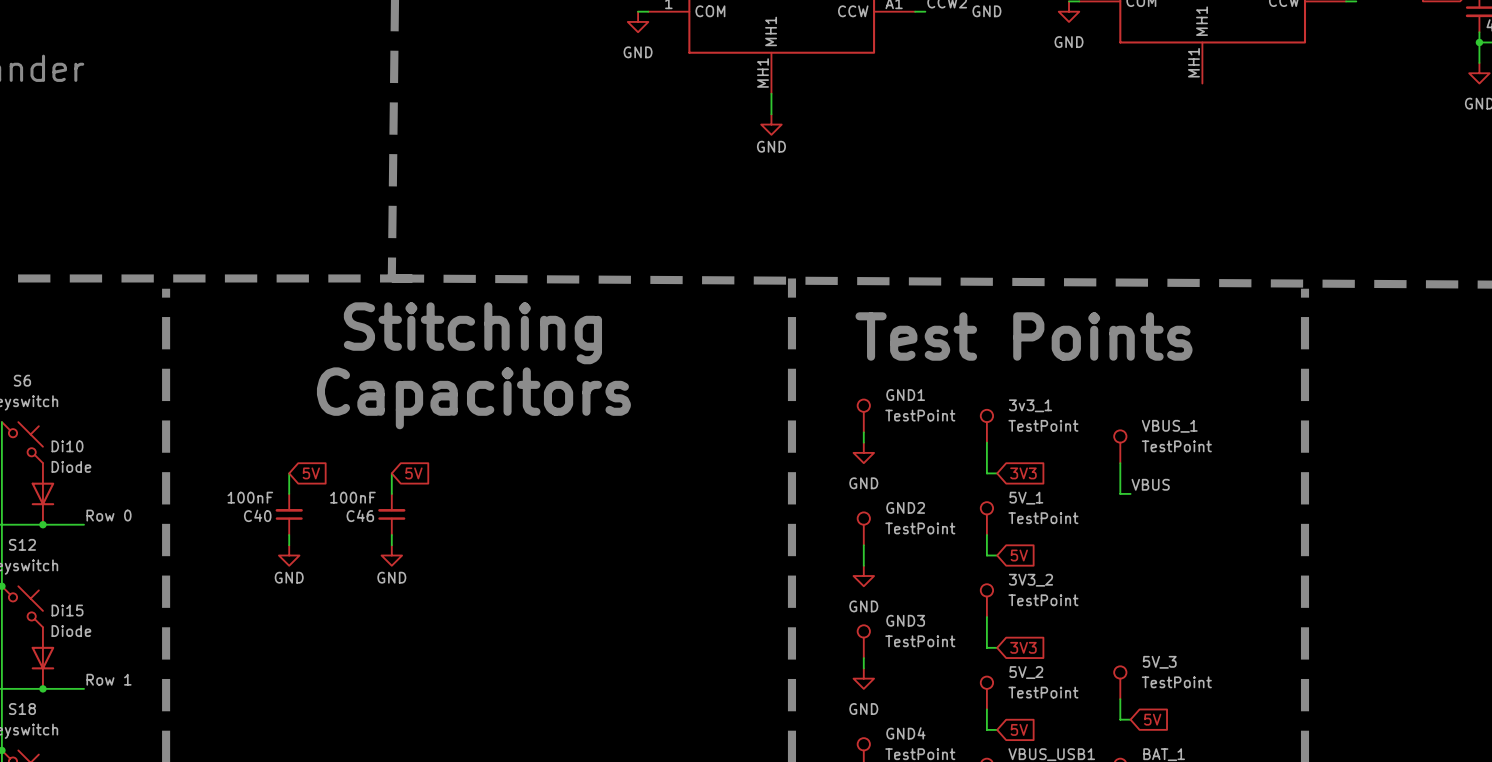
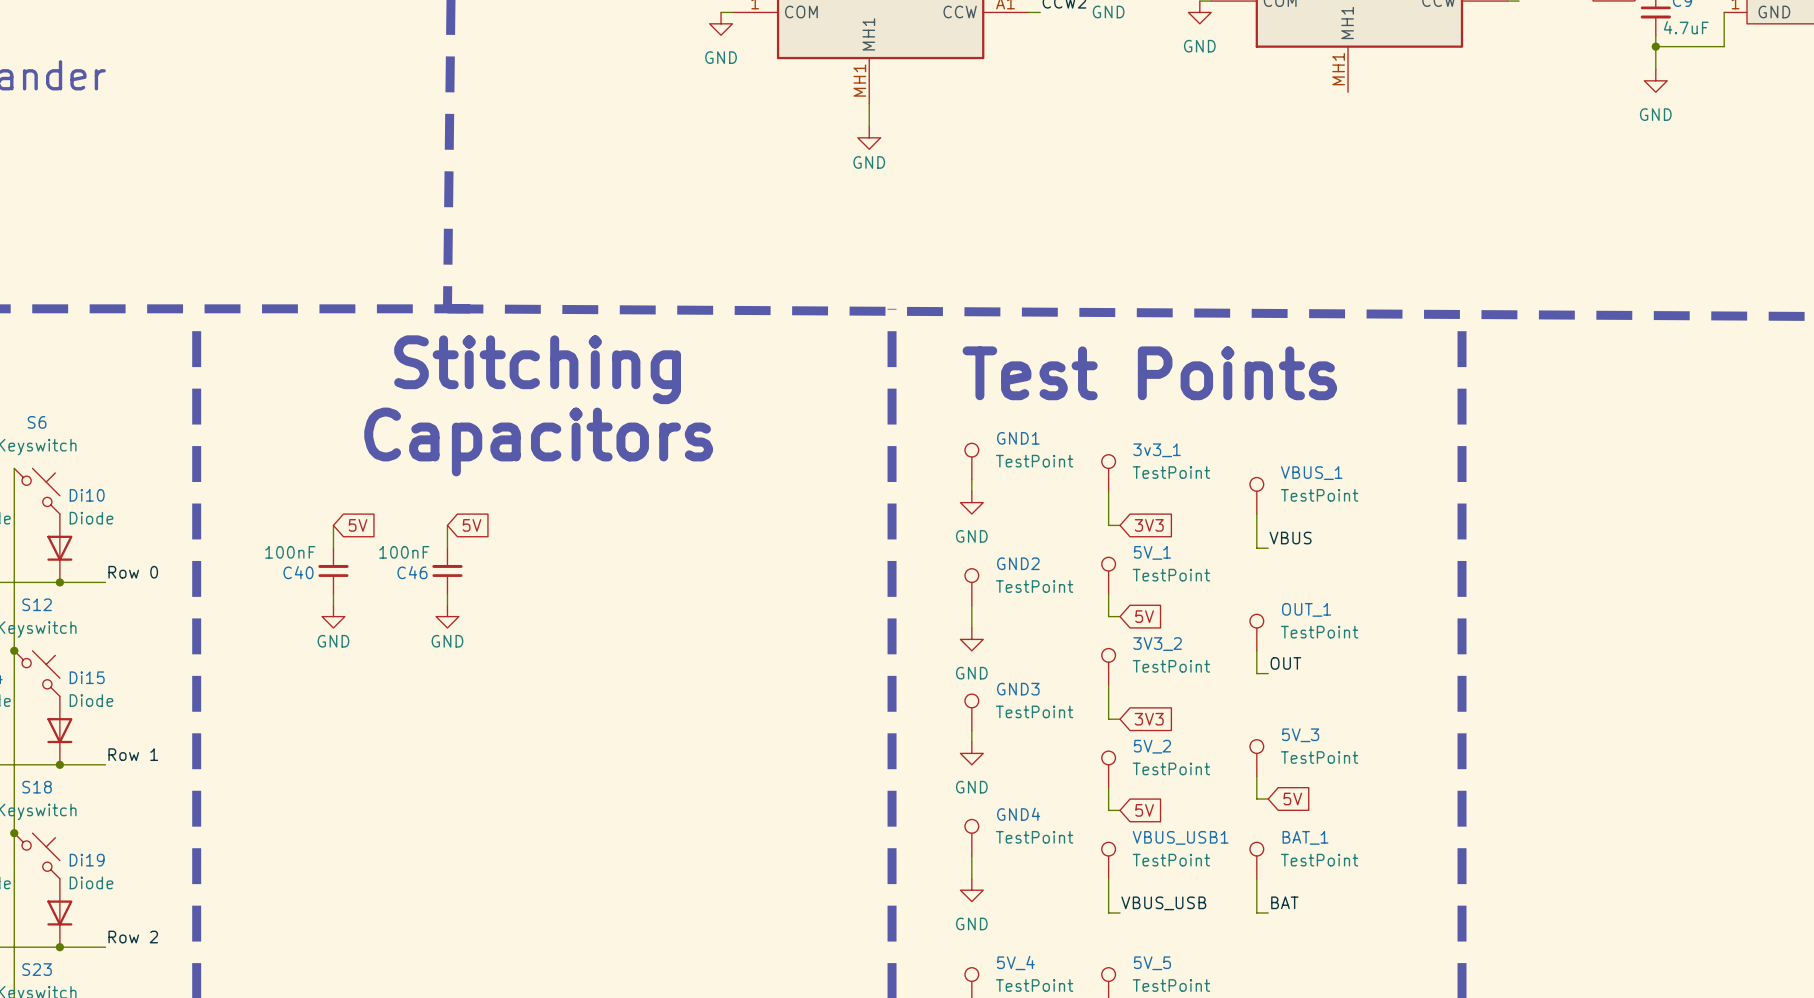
OUT_1: none -> TestPoint (1256, 632)
wire: none -> (1256, 650) (1256, 673) (1268, 673)
label: none -> OUT (1285, 663)

